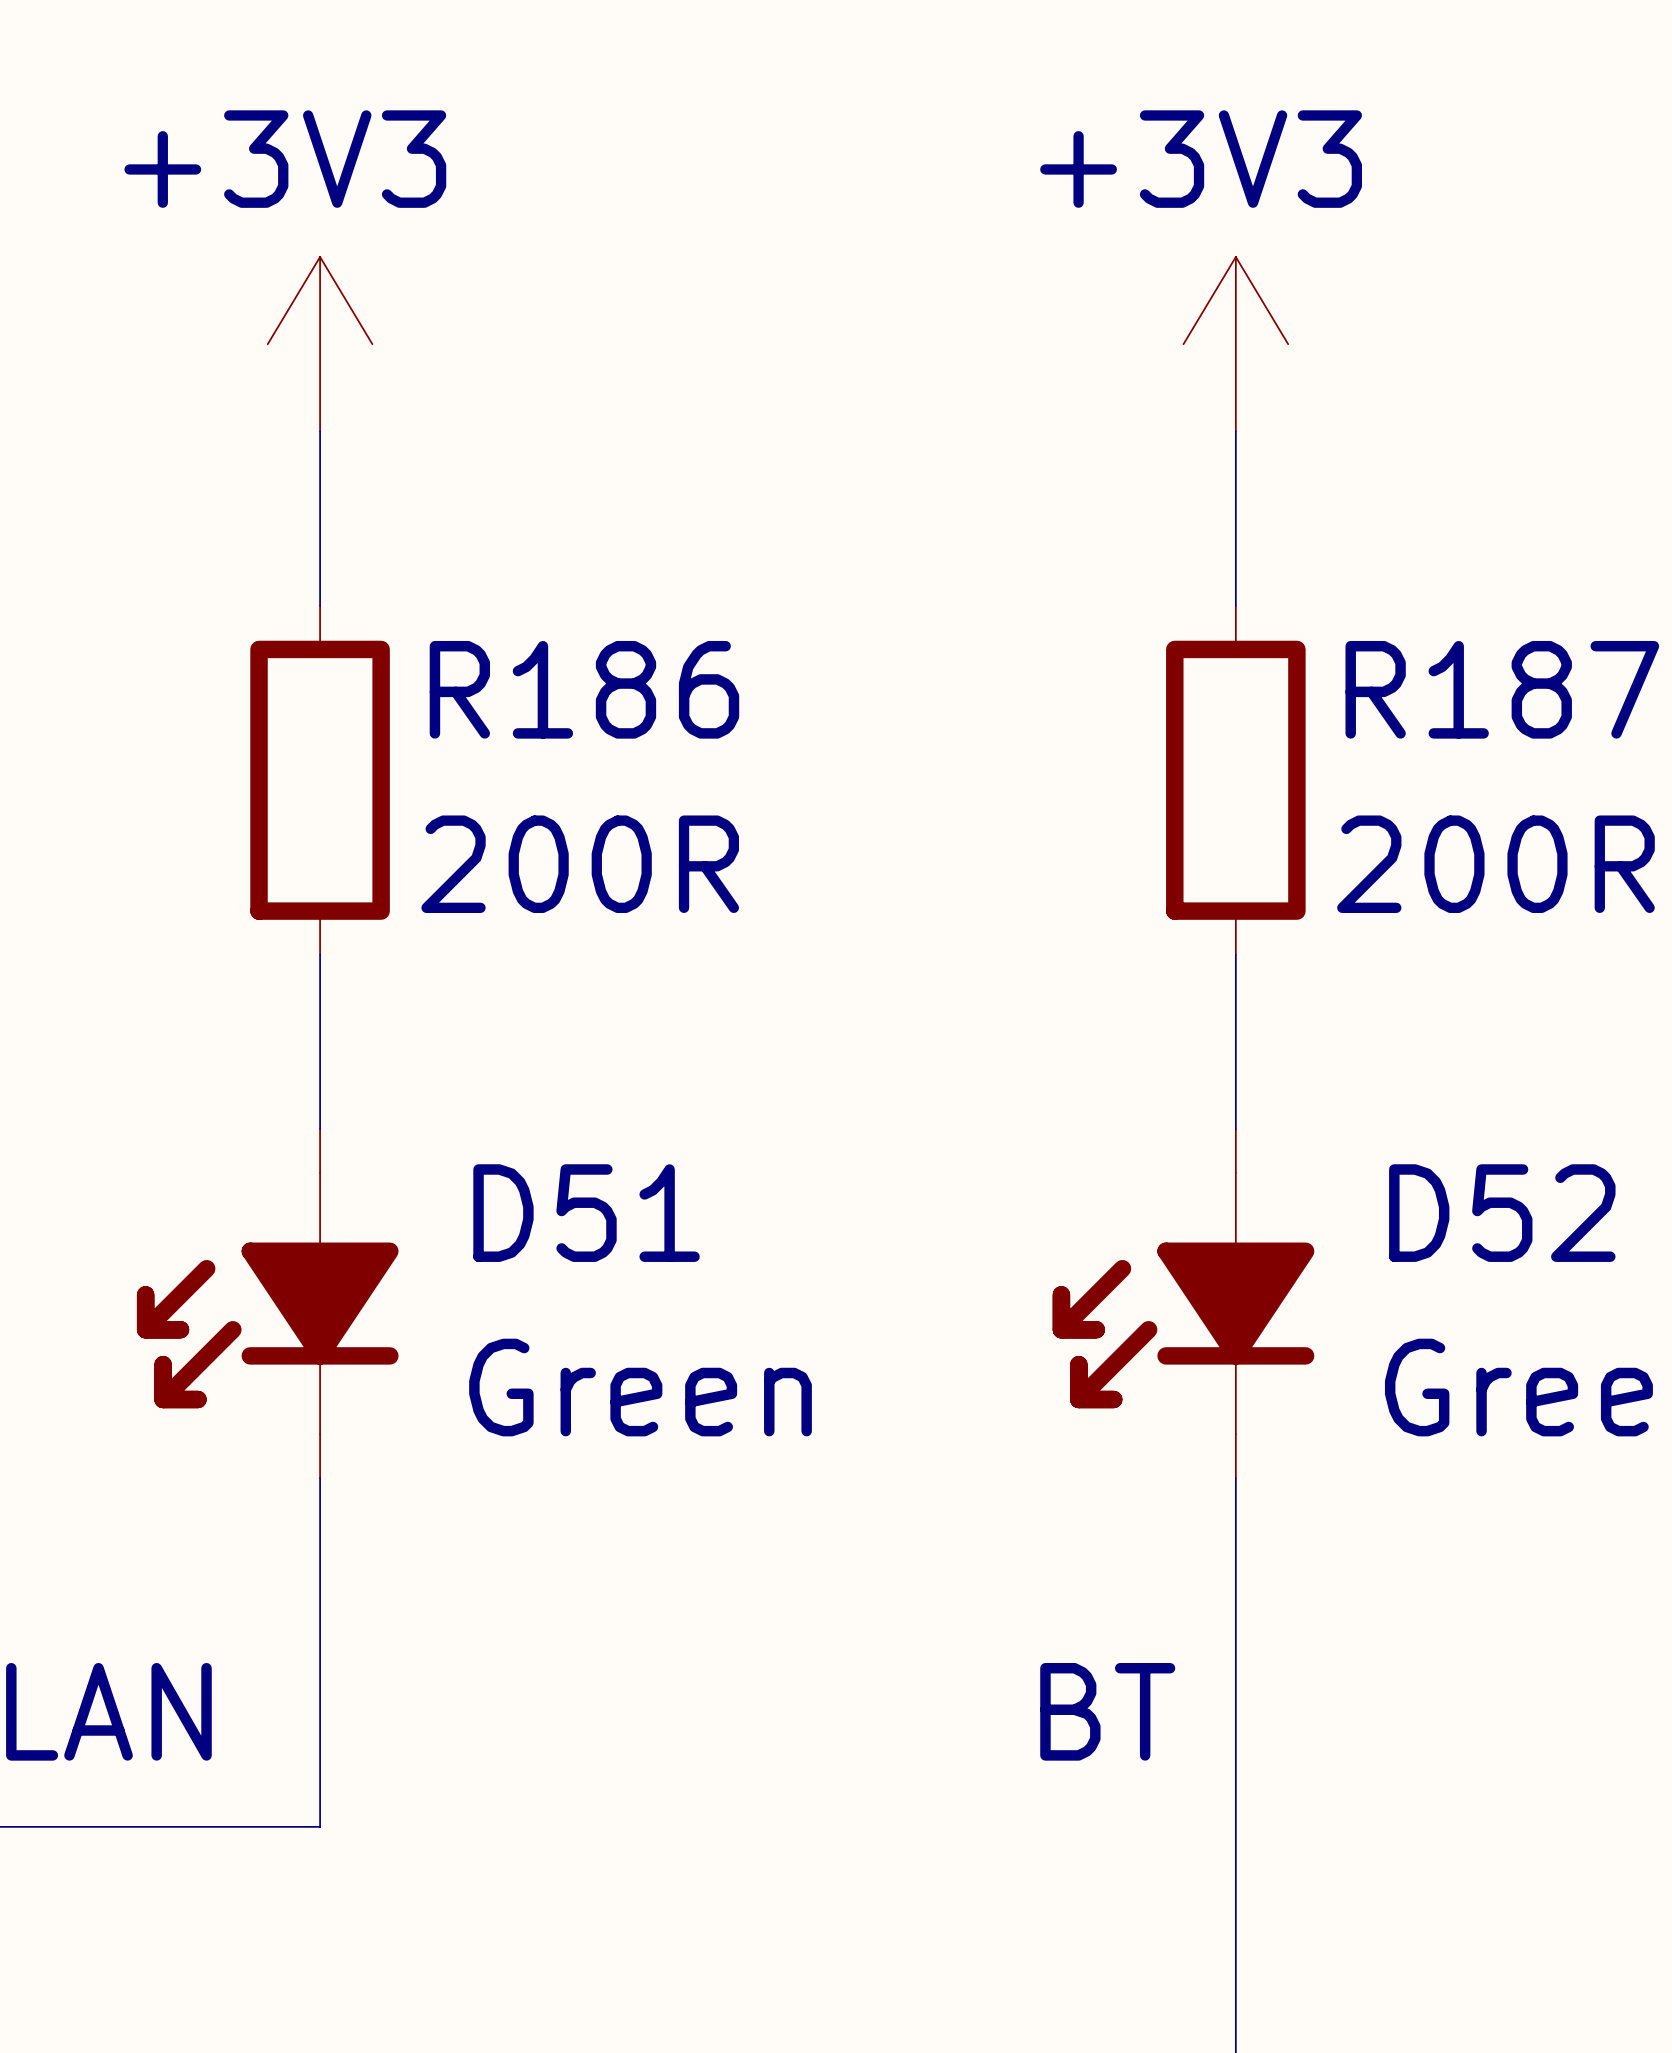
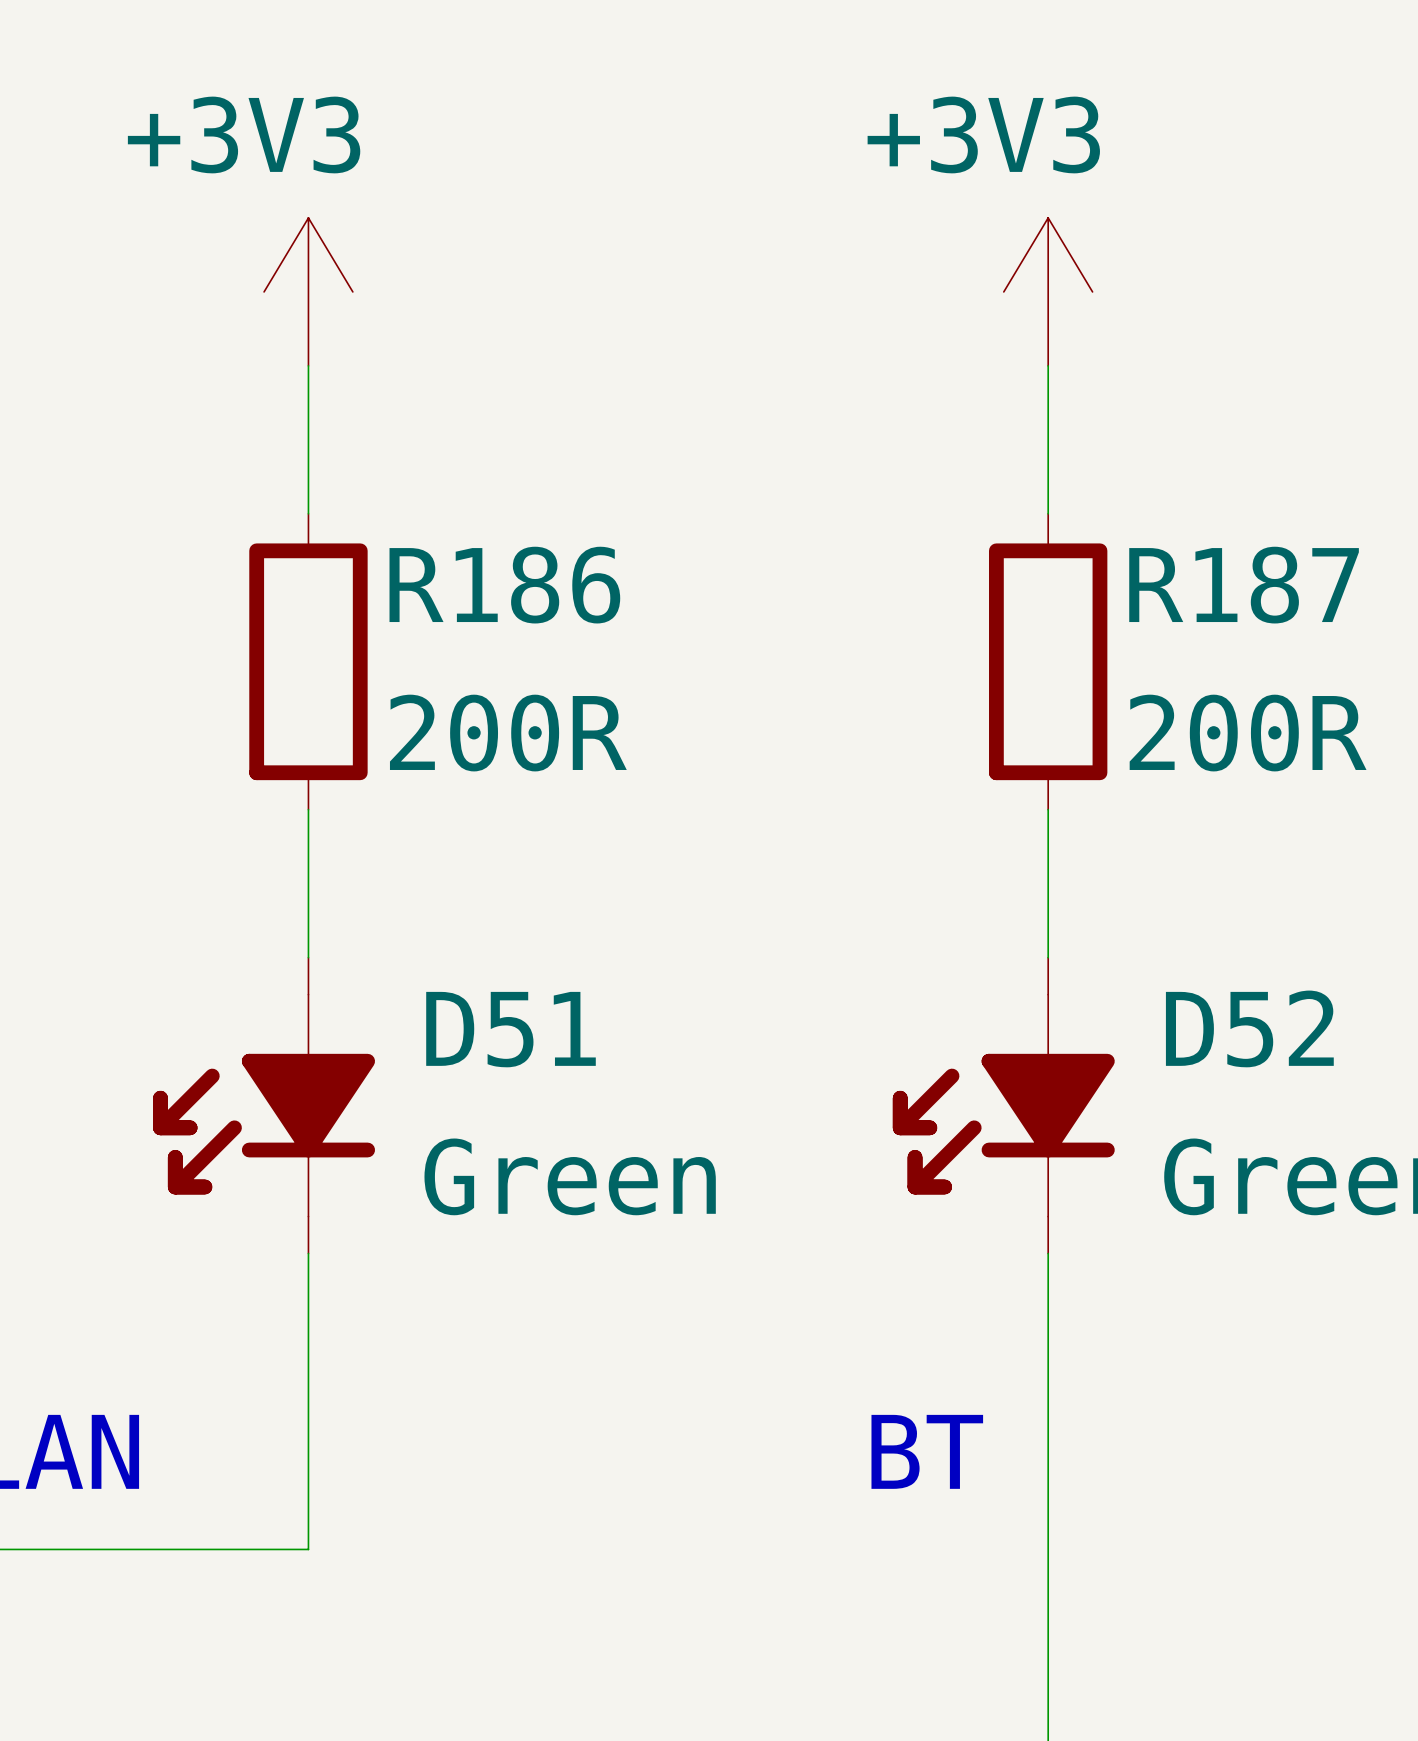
power symbol position: +3V3 (320, 344) -> +3V3 (308, 291)
wire: (320, 431) (320, 605) -> (308, 365) (308, 513)
R186 position: (320, 780) -> (308, 661)
wire: (320, 954) (320, 1129) -> (308, 809) (308, 957)
D51 position: (267, 1303) -> (264, 1105)
wire: (320, 1478) (320, 1826) -> (308, 1253) (308, 1549) (271, 1549)

